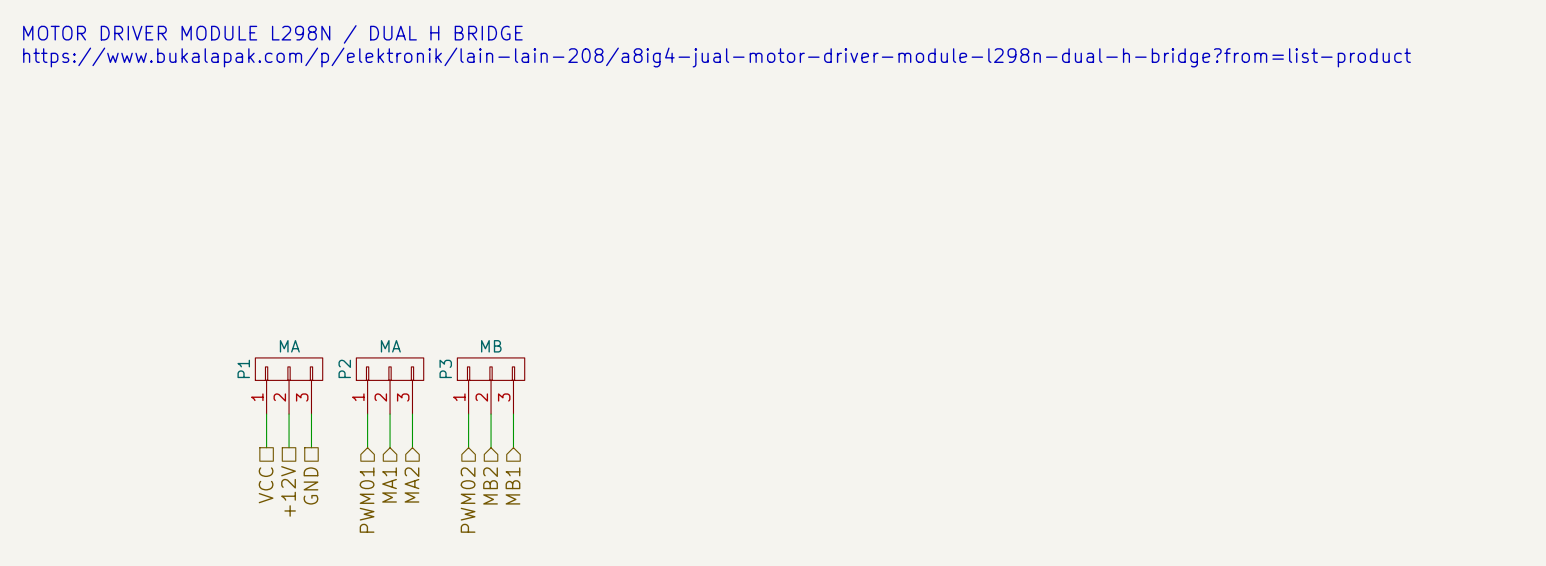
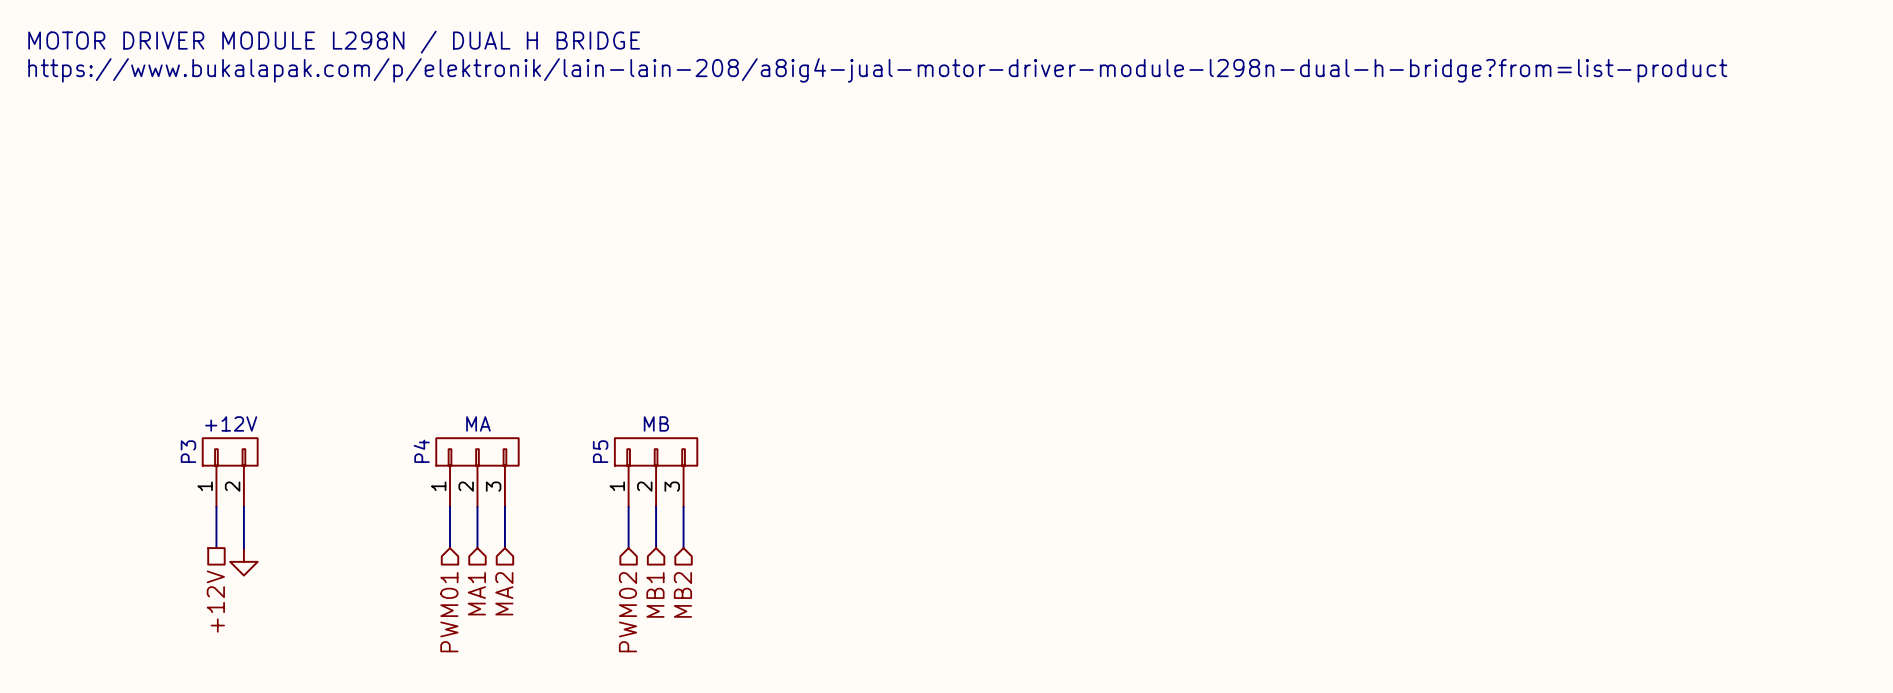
P3 value: MB (491, 346) -> +12V (231, 423)
P3 symbol: [457, 357, 525, 415] -> [202, 438, 258, 507]
P2 name: P2 (344, 368) -> P4 (421, 451)
P1: MA (289, 386) -> none
P5: none -> MB (656, 472)
wire: (266, 414) (266, 447) -> (216, 506) (216, 548)
wire: (289, 414) (289, 447) -> (243, 506) (243, 548)
wire: (311, 414) (311, 447) -> none
wire: (468, 414) (468, 447) -> (656, 506) (656, 548)
wire: (491, 414) (491, 447) -> (683, 506) (683, 548)
power symbol: none -> (243, 561)
hierarchical label: VCC (266, 485) -> none
hierarchical label: GND (310, 485) -> none
hierarchical label position: MB2 (490, 485) -> MB2 (682, 594)
hierarchical label: MB1 (512, 485) -> PWM02 (627, 612)
hierarchical label: none -> MB1 (655, 594)
hierarchical label position: +12V (288, 491) -> +12V (215, 601)
hierarchical label: PWM02 (468, 500) -> none

